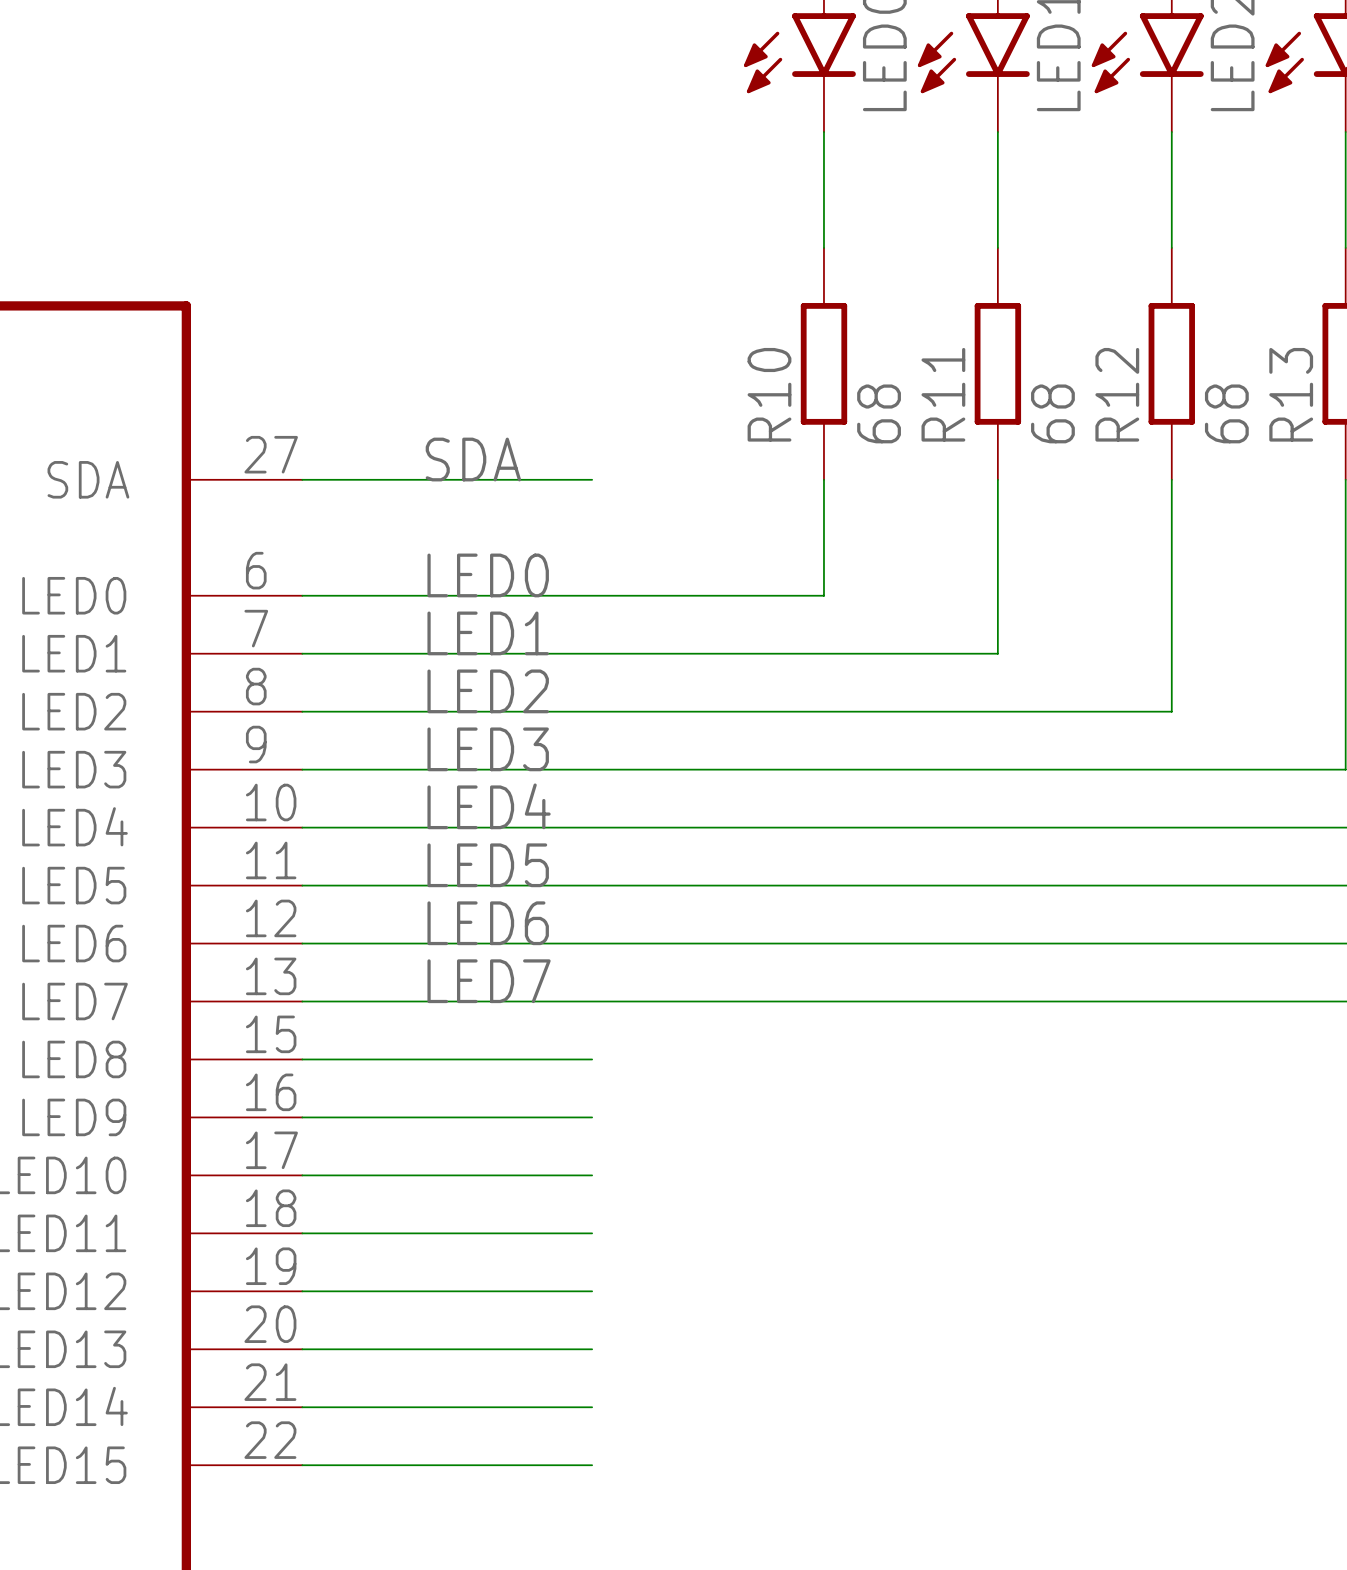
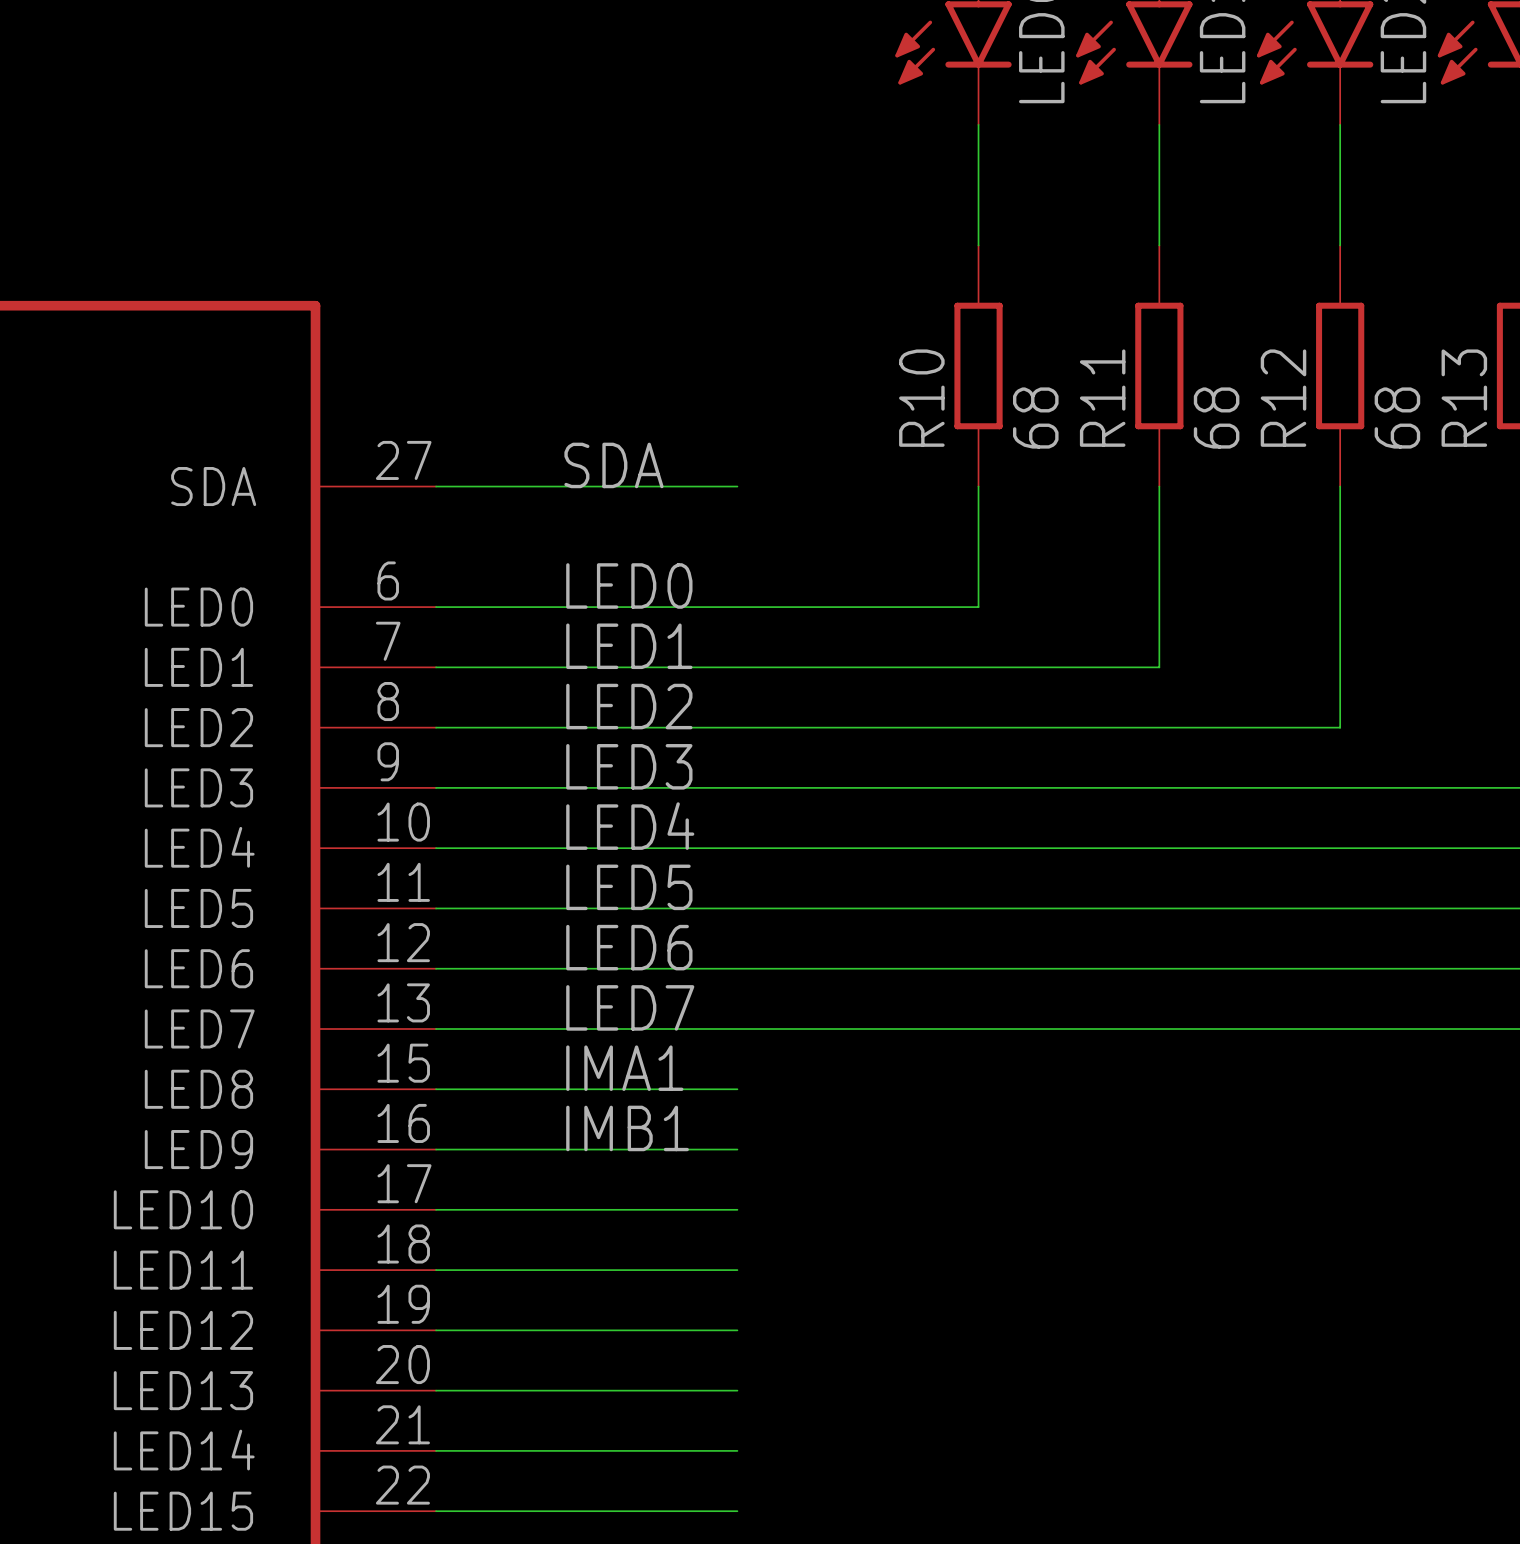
label: none -> IMA1 (624, 1068)
label: none -> IMB1 (627, 1128)

